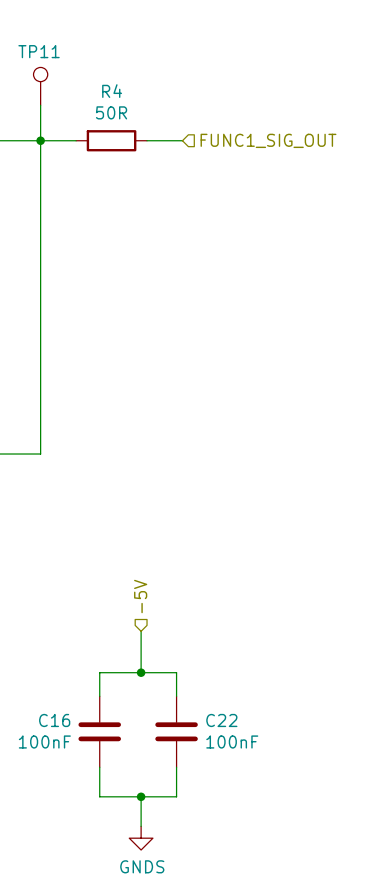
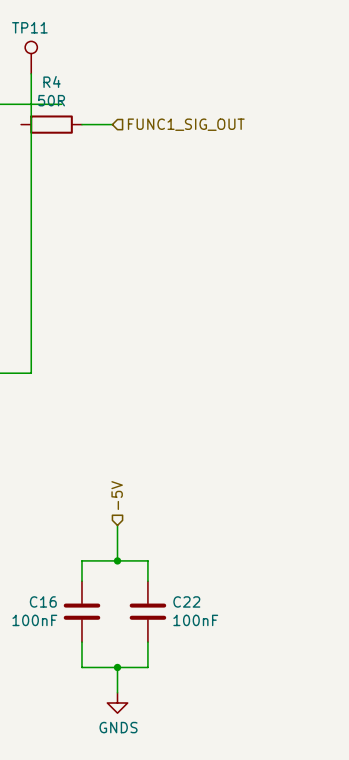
junction: (40, 140) -> none
R4 position: (111, 140) -> (51, 124)
wire: (147, 140) (182, 140) -> (81, 124) (112, 124)
hierarchical label position: FUNC1_SIG_OUT (268, 140) -> FUNC1_SIG_OUT (186, 124)

